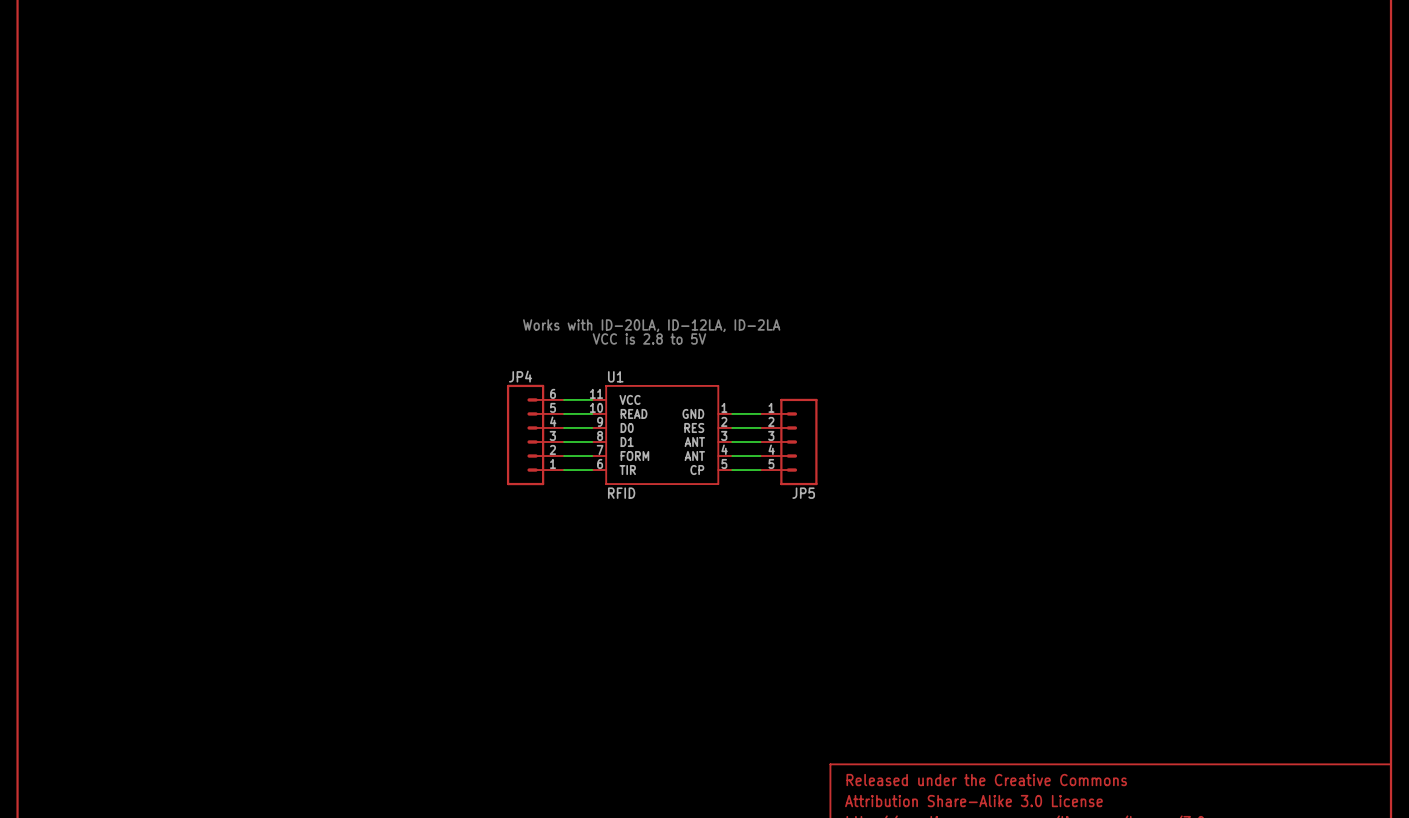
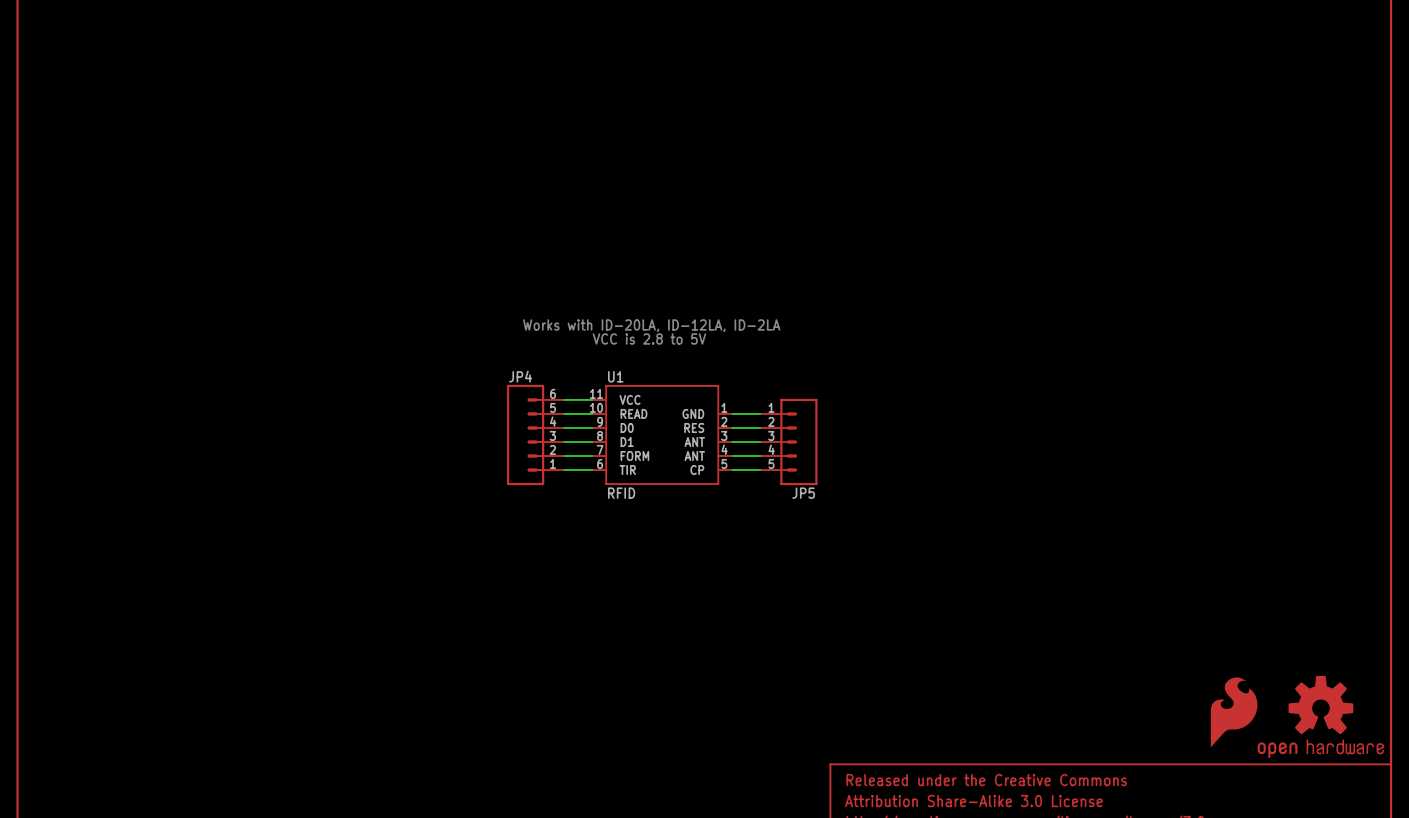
part: none -> (1234, 712)
part: none -> (1320, 716)

